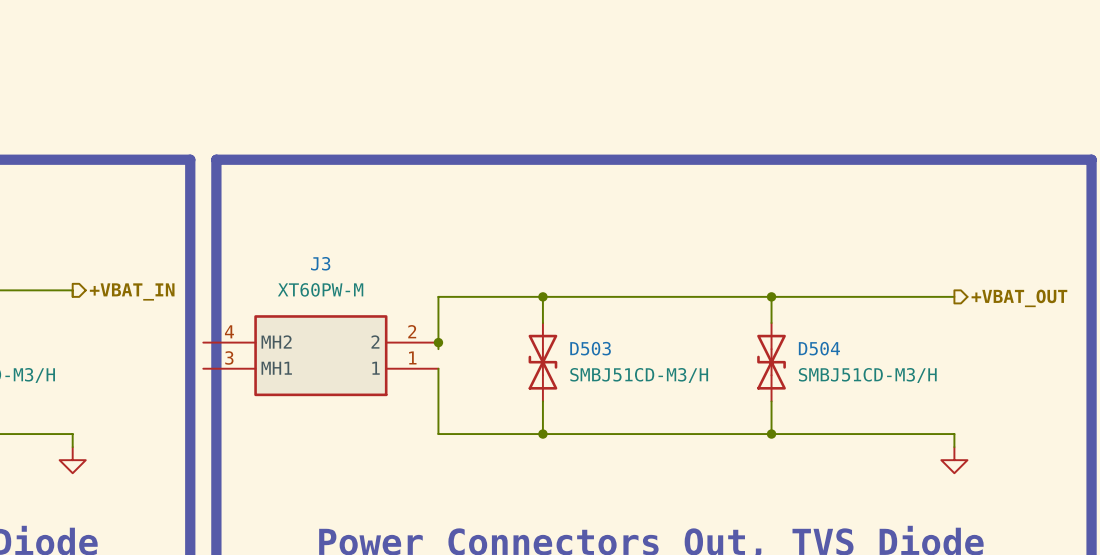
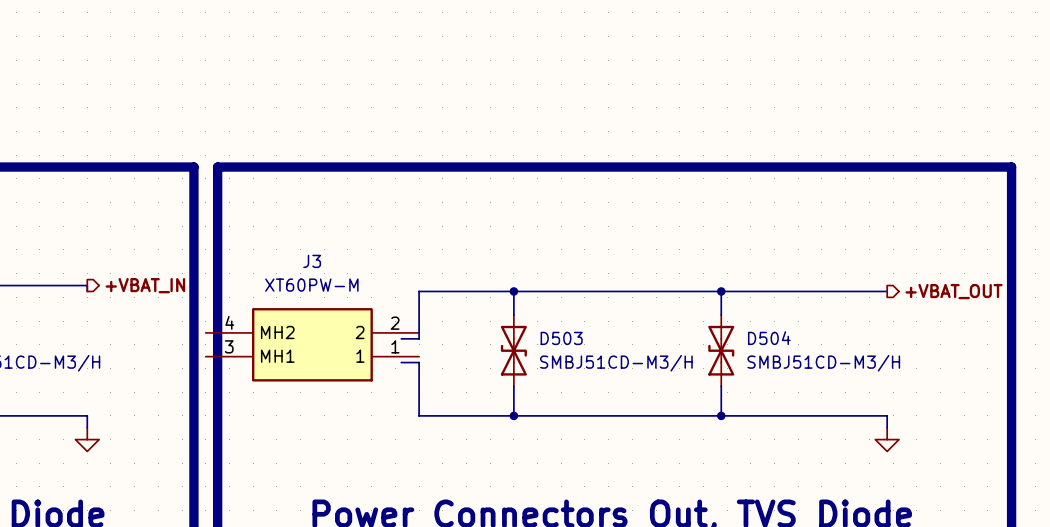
junction: (438, 342) -> none
wire: none -> (401, 338) (419, 338)
wire: (438, 368) (438, 375) -> (401, 362) (419, 362)

